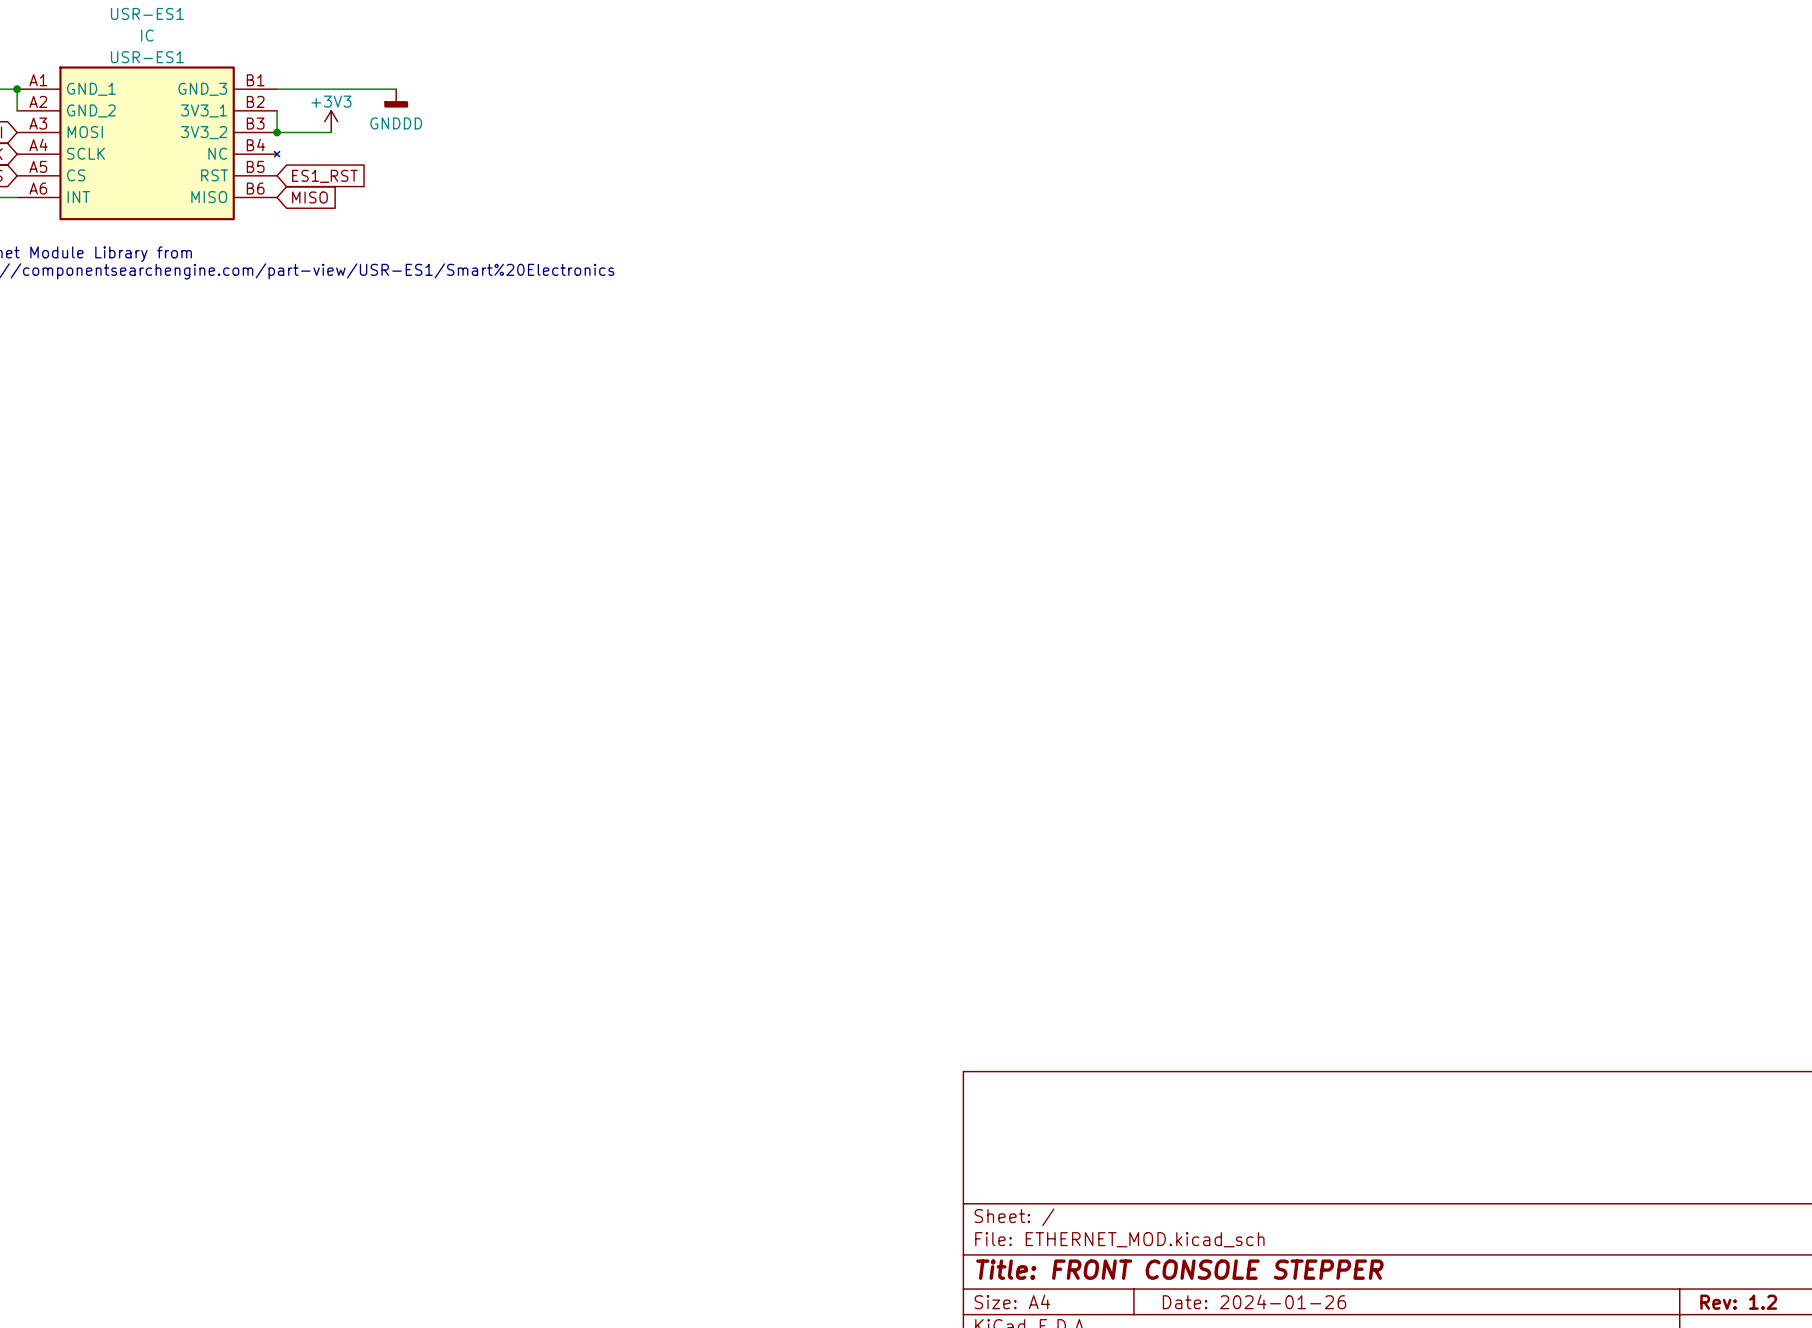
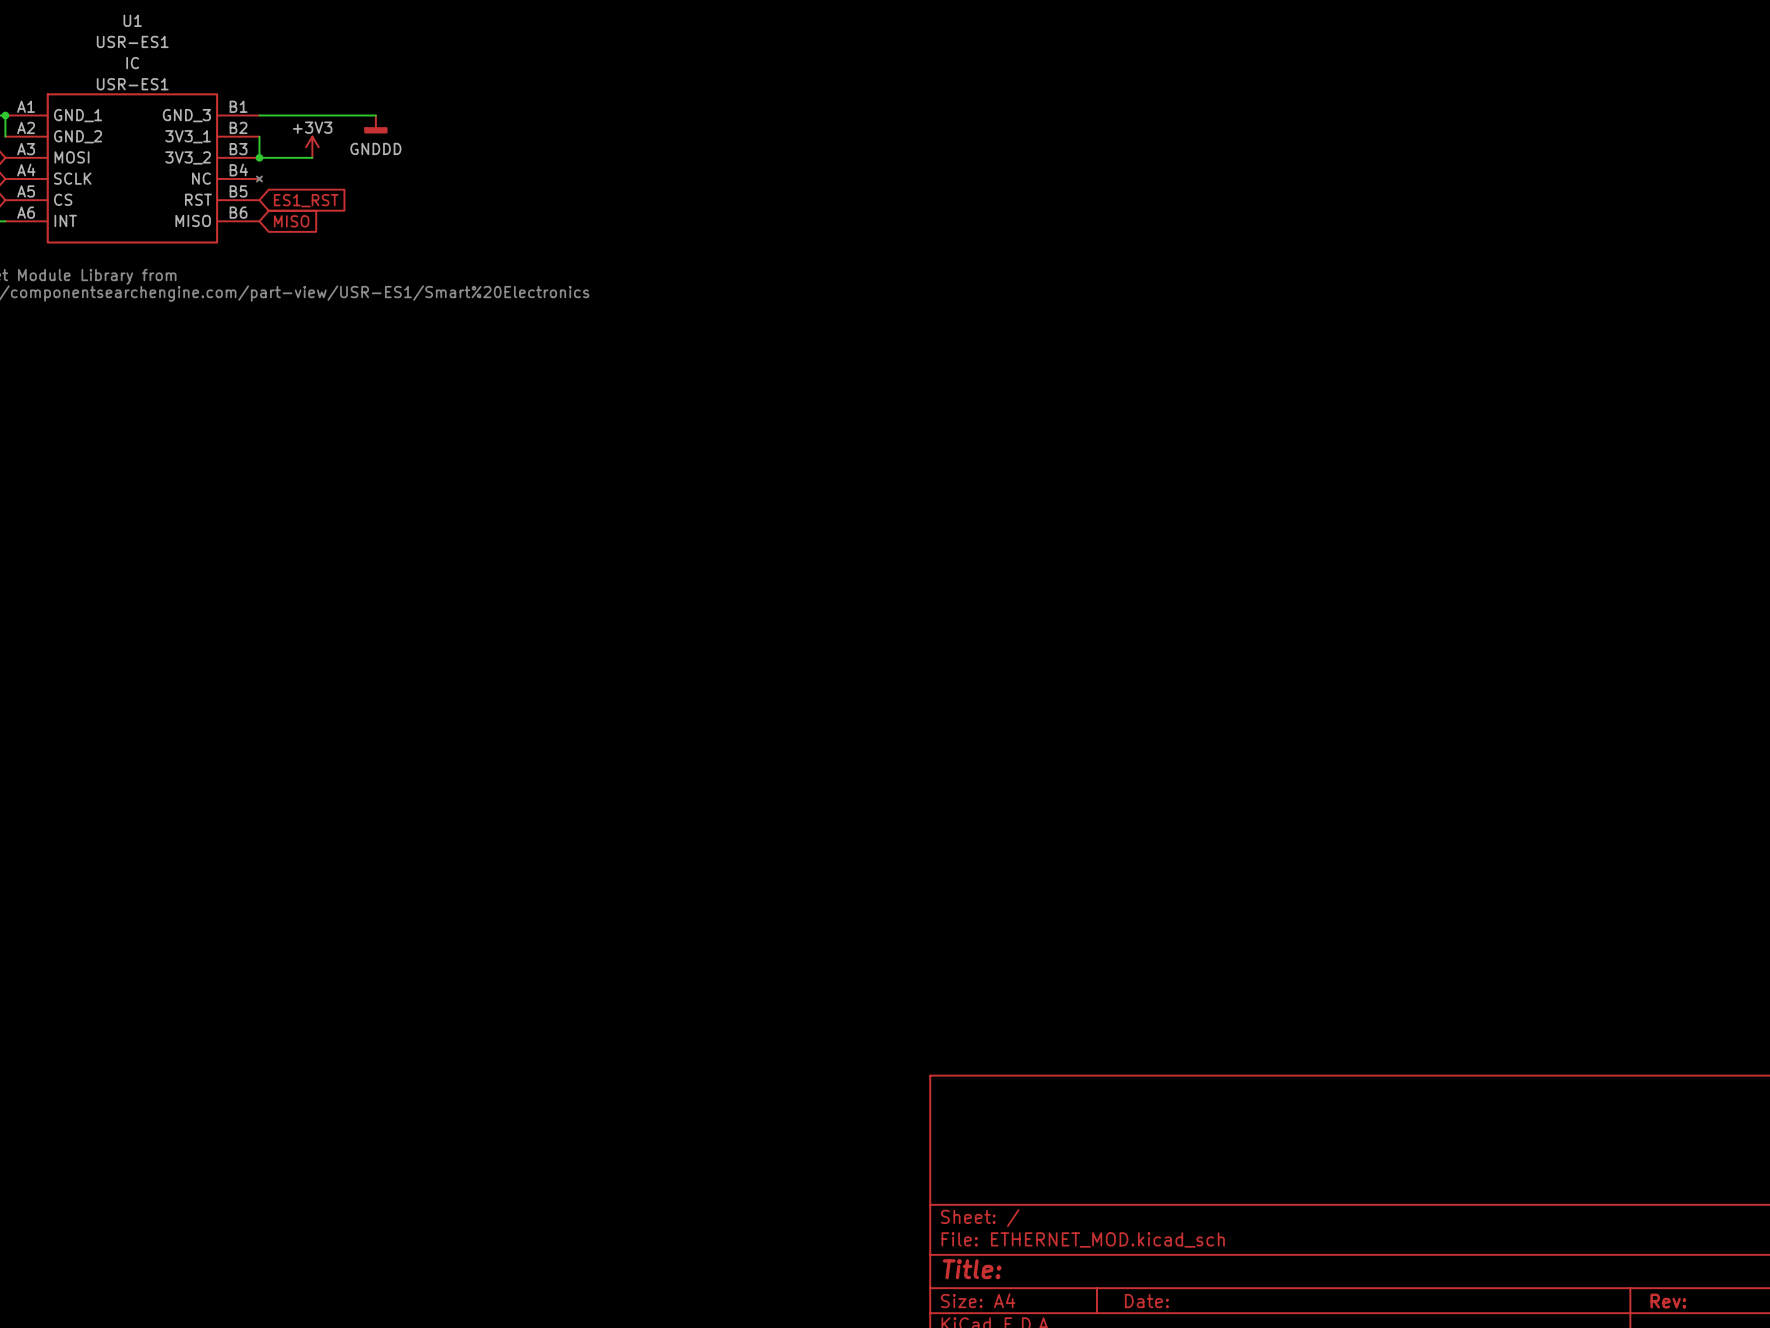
title block: Title: FRONT CONSOLE STEPPER (1179, 1269) -> Title: (972, 1269)
title block: Date: 2024-01-26 (1254, 1301) -> Date: (1146, 1301)
title block: Rev: 1.2 (1738, 1302) -> Rev: (1668, 1301)

